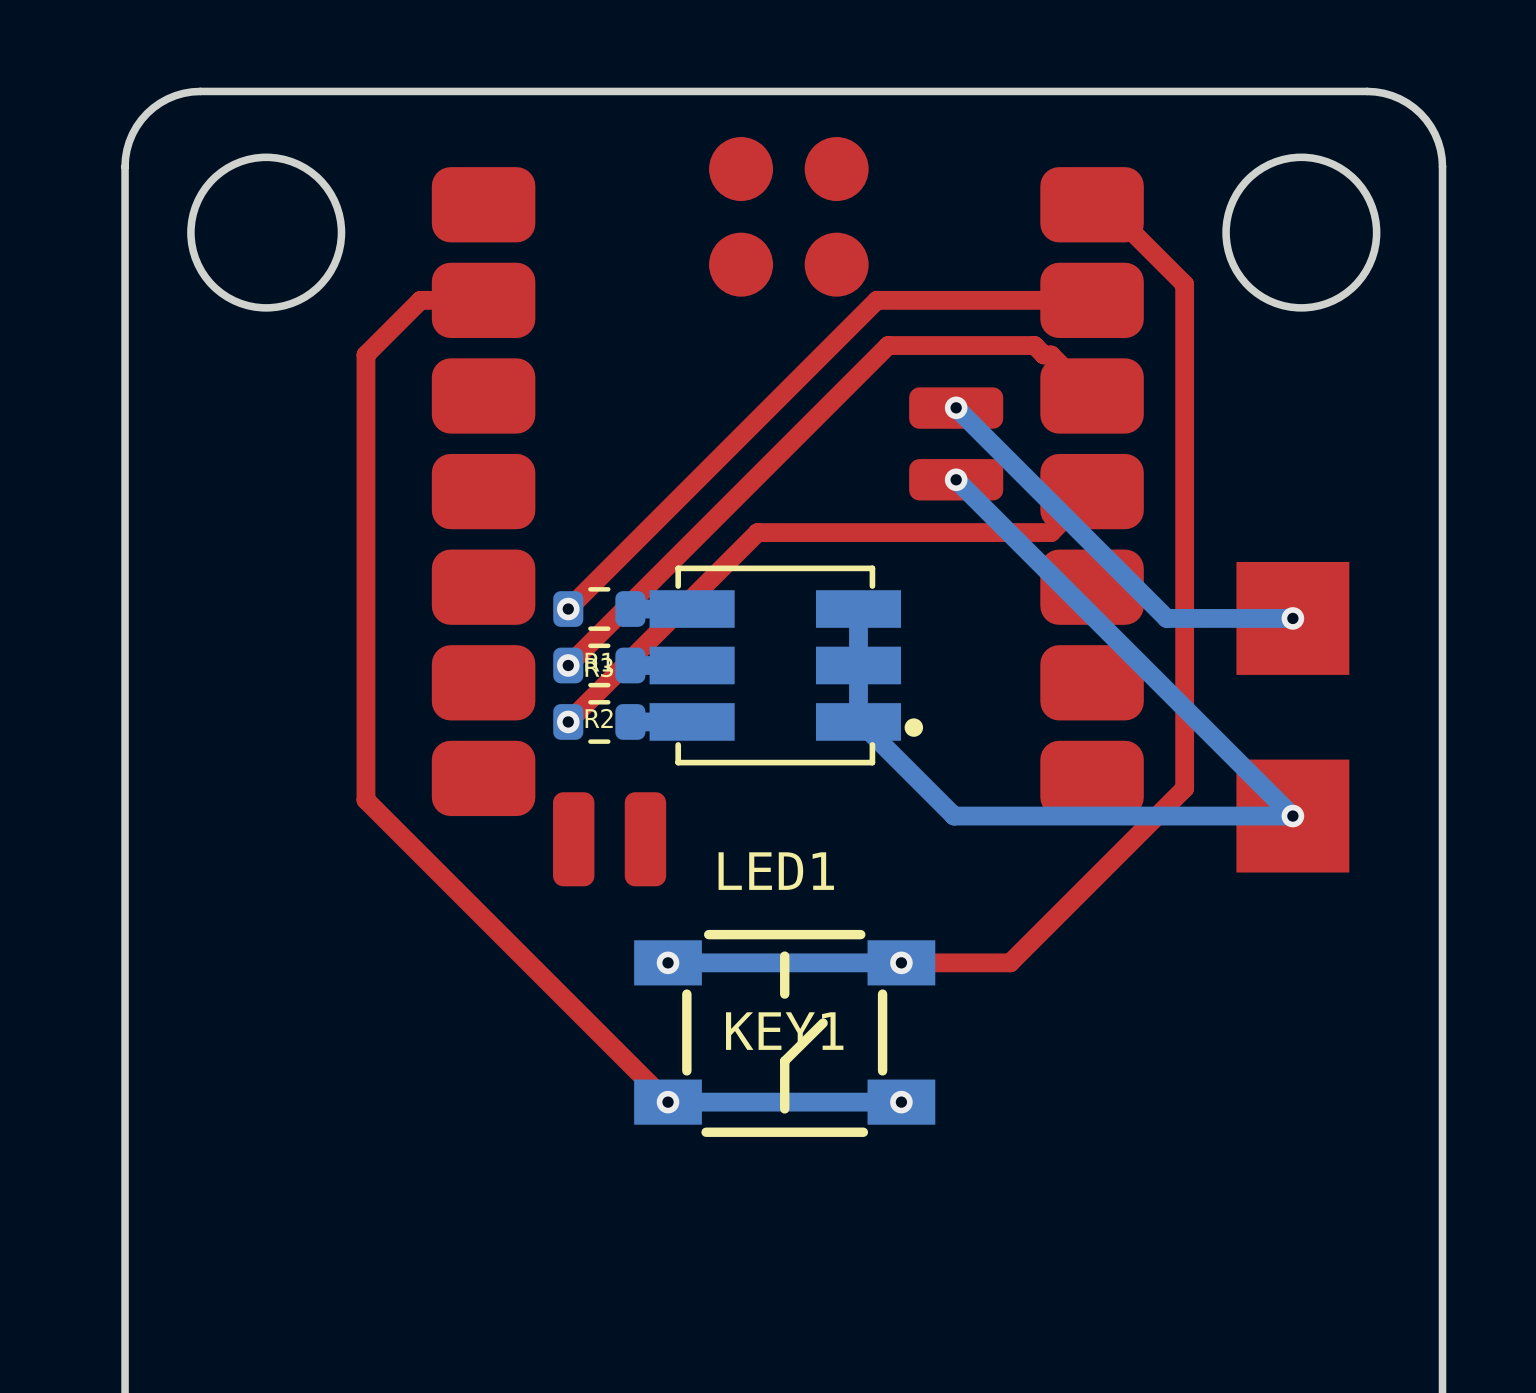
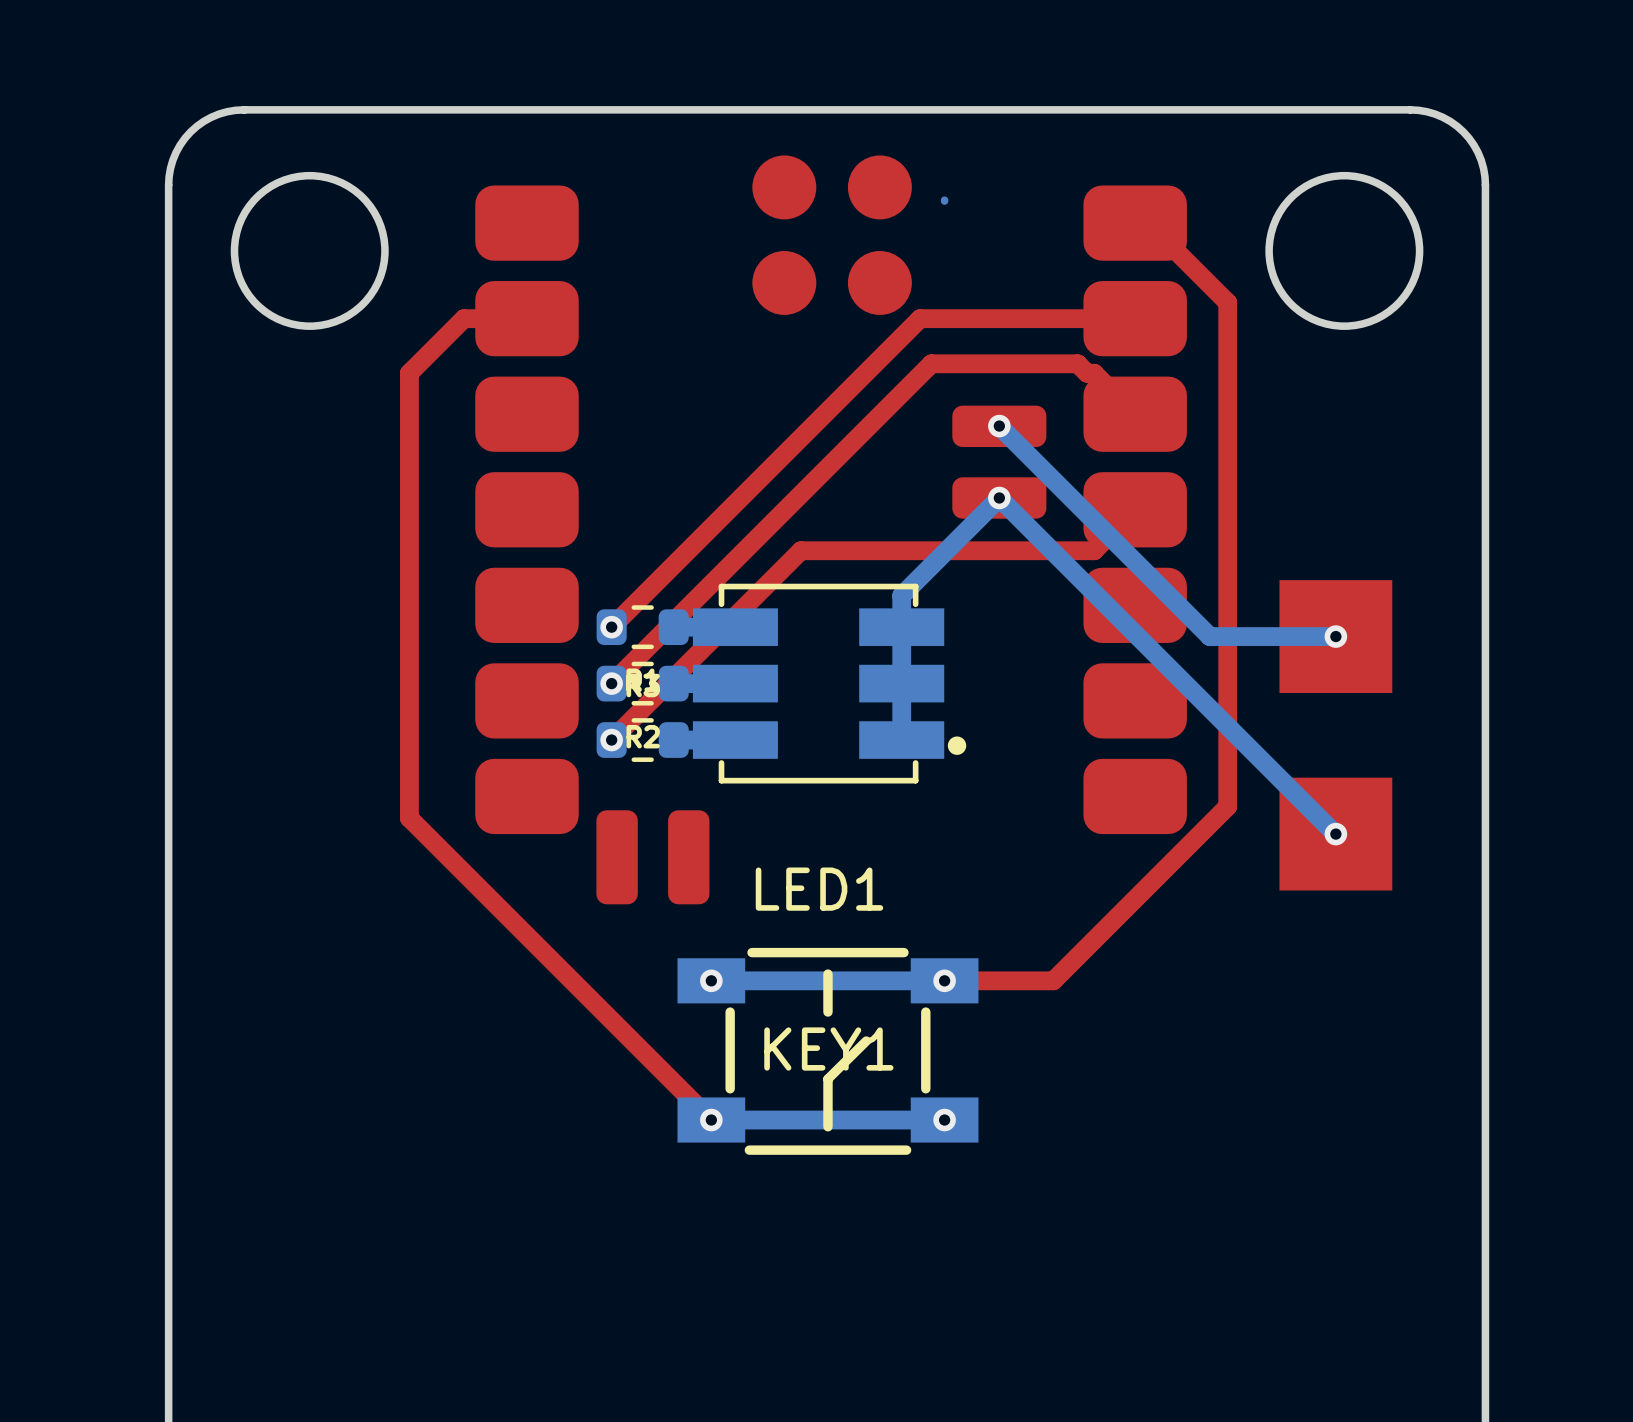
bottom track: none -> (944, 200) (944, 201)
bottom track: none -> (999, 497) (901, 595) (901, 627)
bottom track: (858, 721) (954, 816) (1292, 816) -> none

